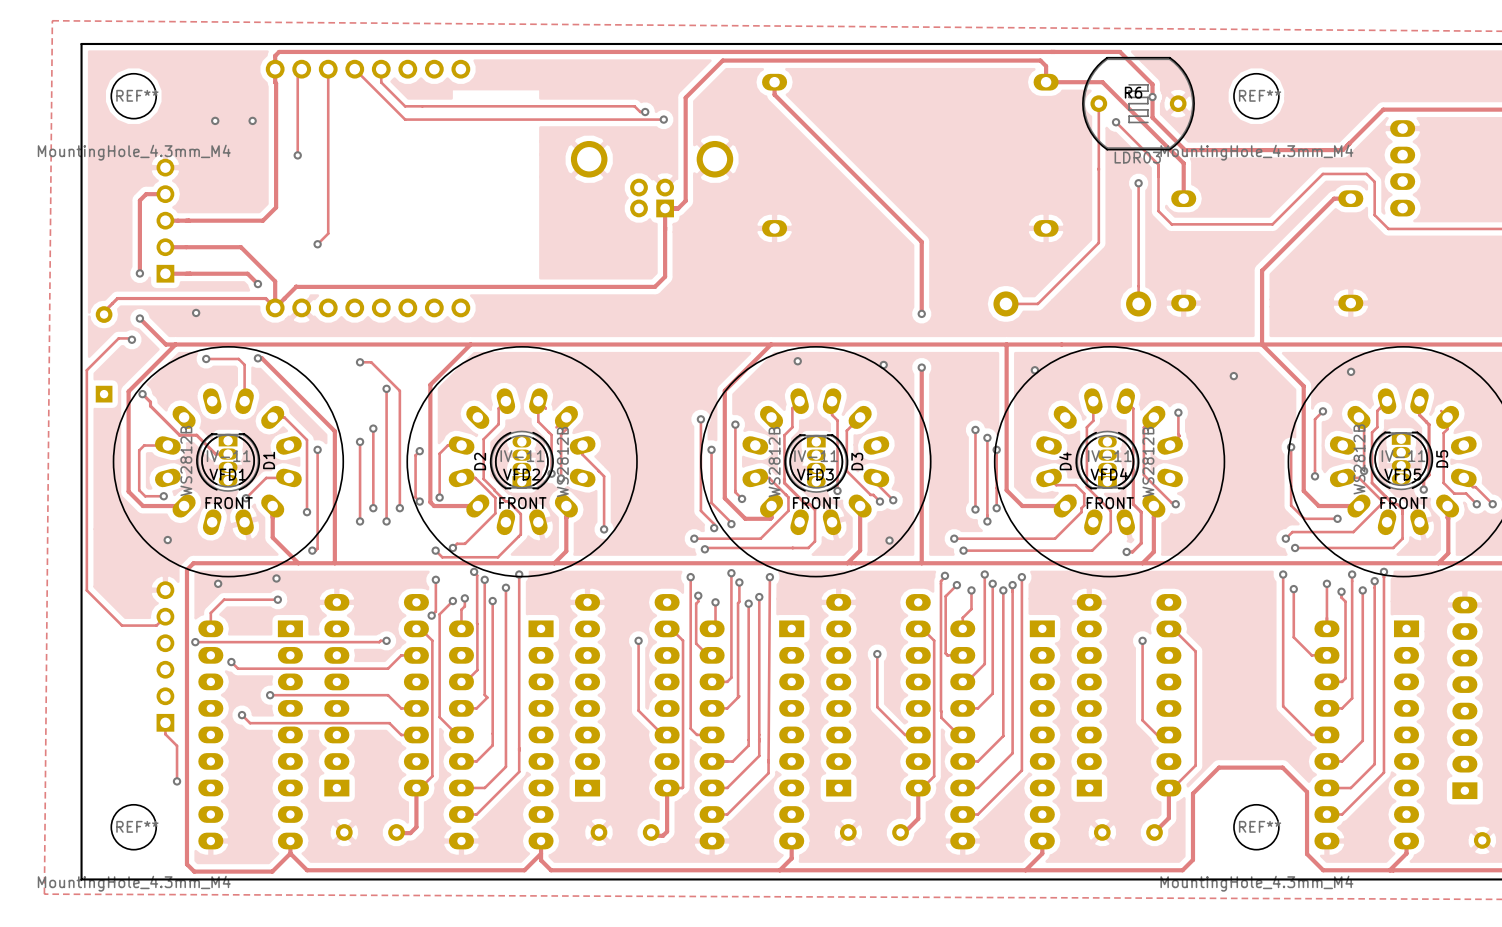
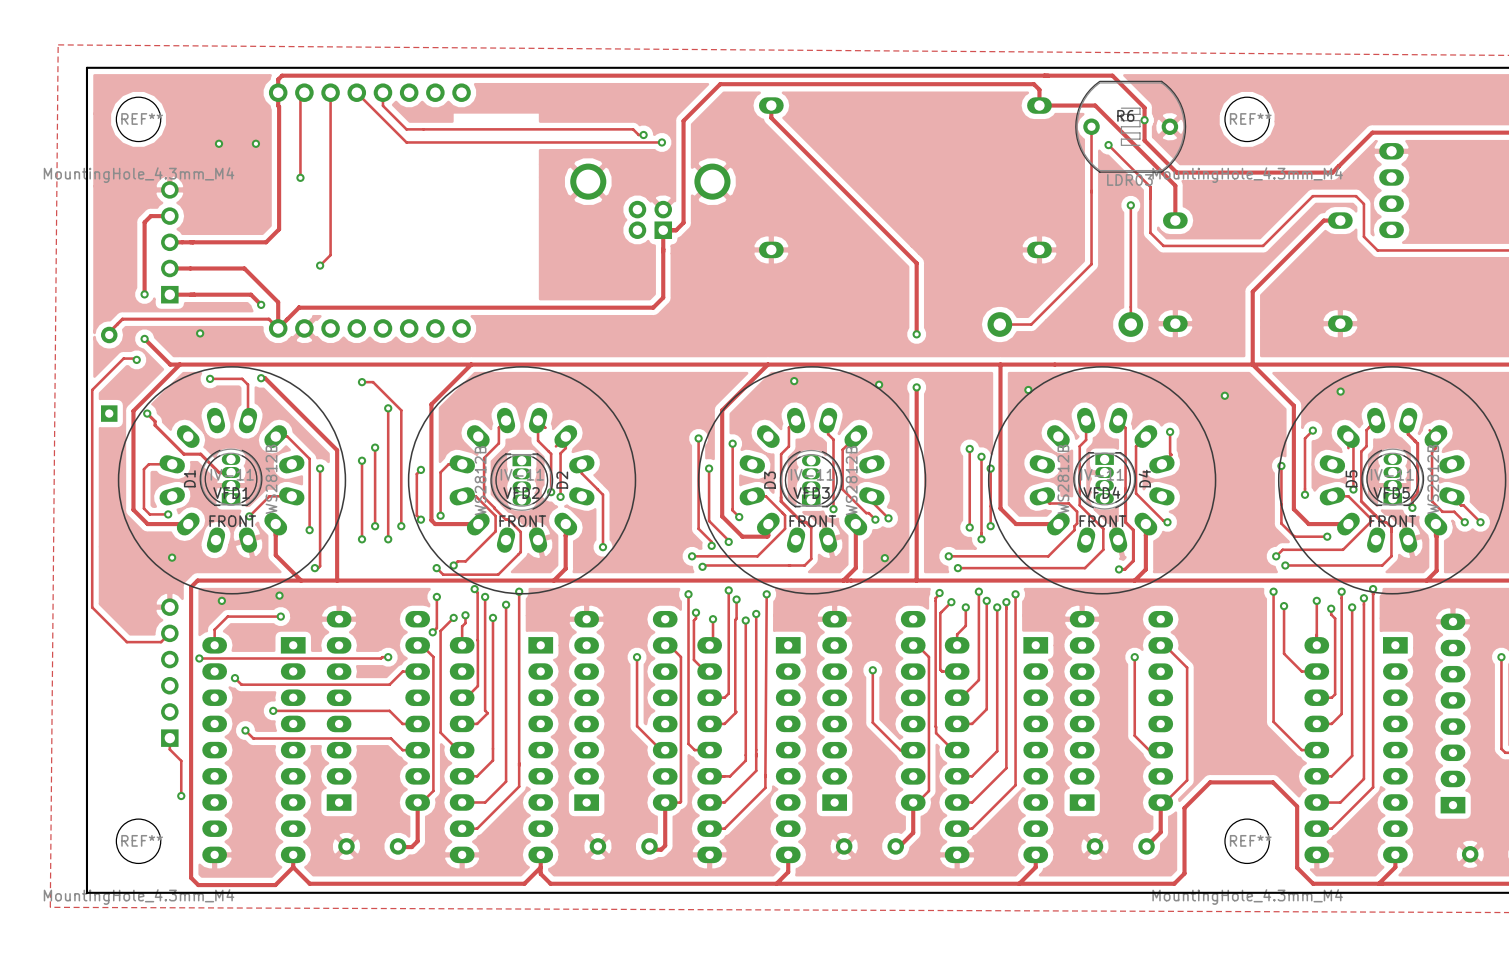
D2 rotation: 0° (521, 460) -> 180° (521, 482)
D4 rotation: 0° (1107, 460) -> 180° (1104, 480)
D5 rotation: 0° (1401, 460) -> 180° (1392, 477)
D1 rotation: 0° (228, 462) -> 180° (231, 477)
D3 rotation: 0° (816, 463) -> 180° (811, 478)

